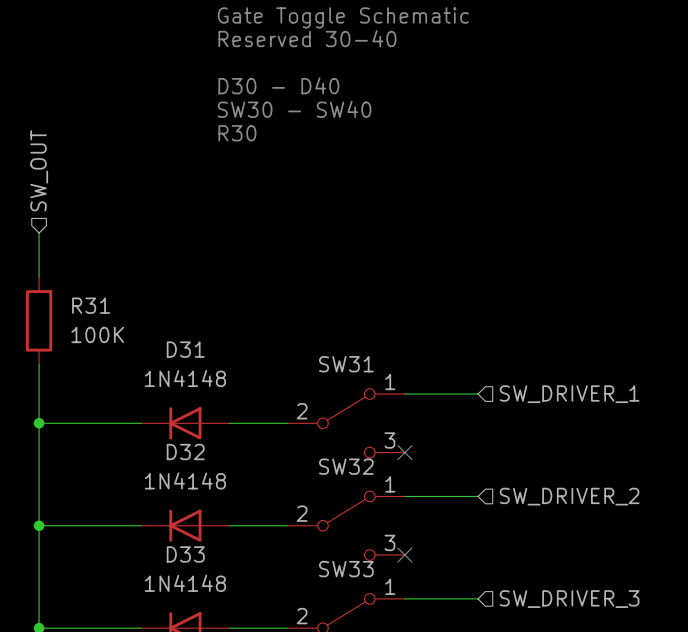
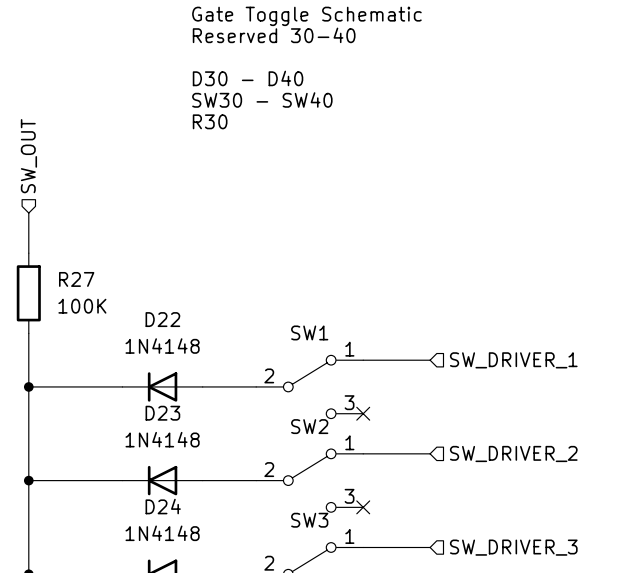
R31 name: R31 (91, 305) -> R27 (76, 279)
D31 name: D31 (185, 349) -> D22 (162, 319)
SW31 name: SW31 (346, 364) -> SW1 (309, 332)
D32 name: D32 (185, 452) -> D23 (162, 413)
SW32 name: SW32 (346, 466) -> SW2 (309, 426)
D33 name: D33 (185, 554) -> D24 (163, 506)
SW33 name: SW33 (346, 569) -> SW3 (309, 520)

